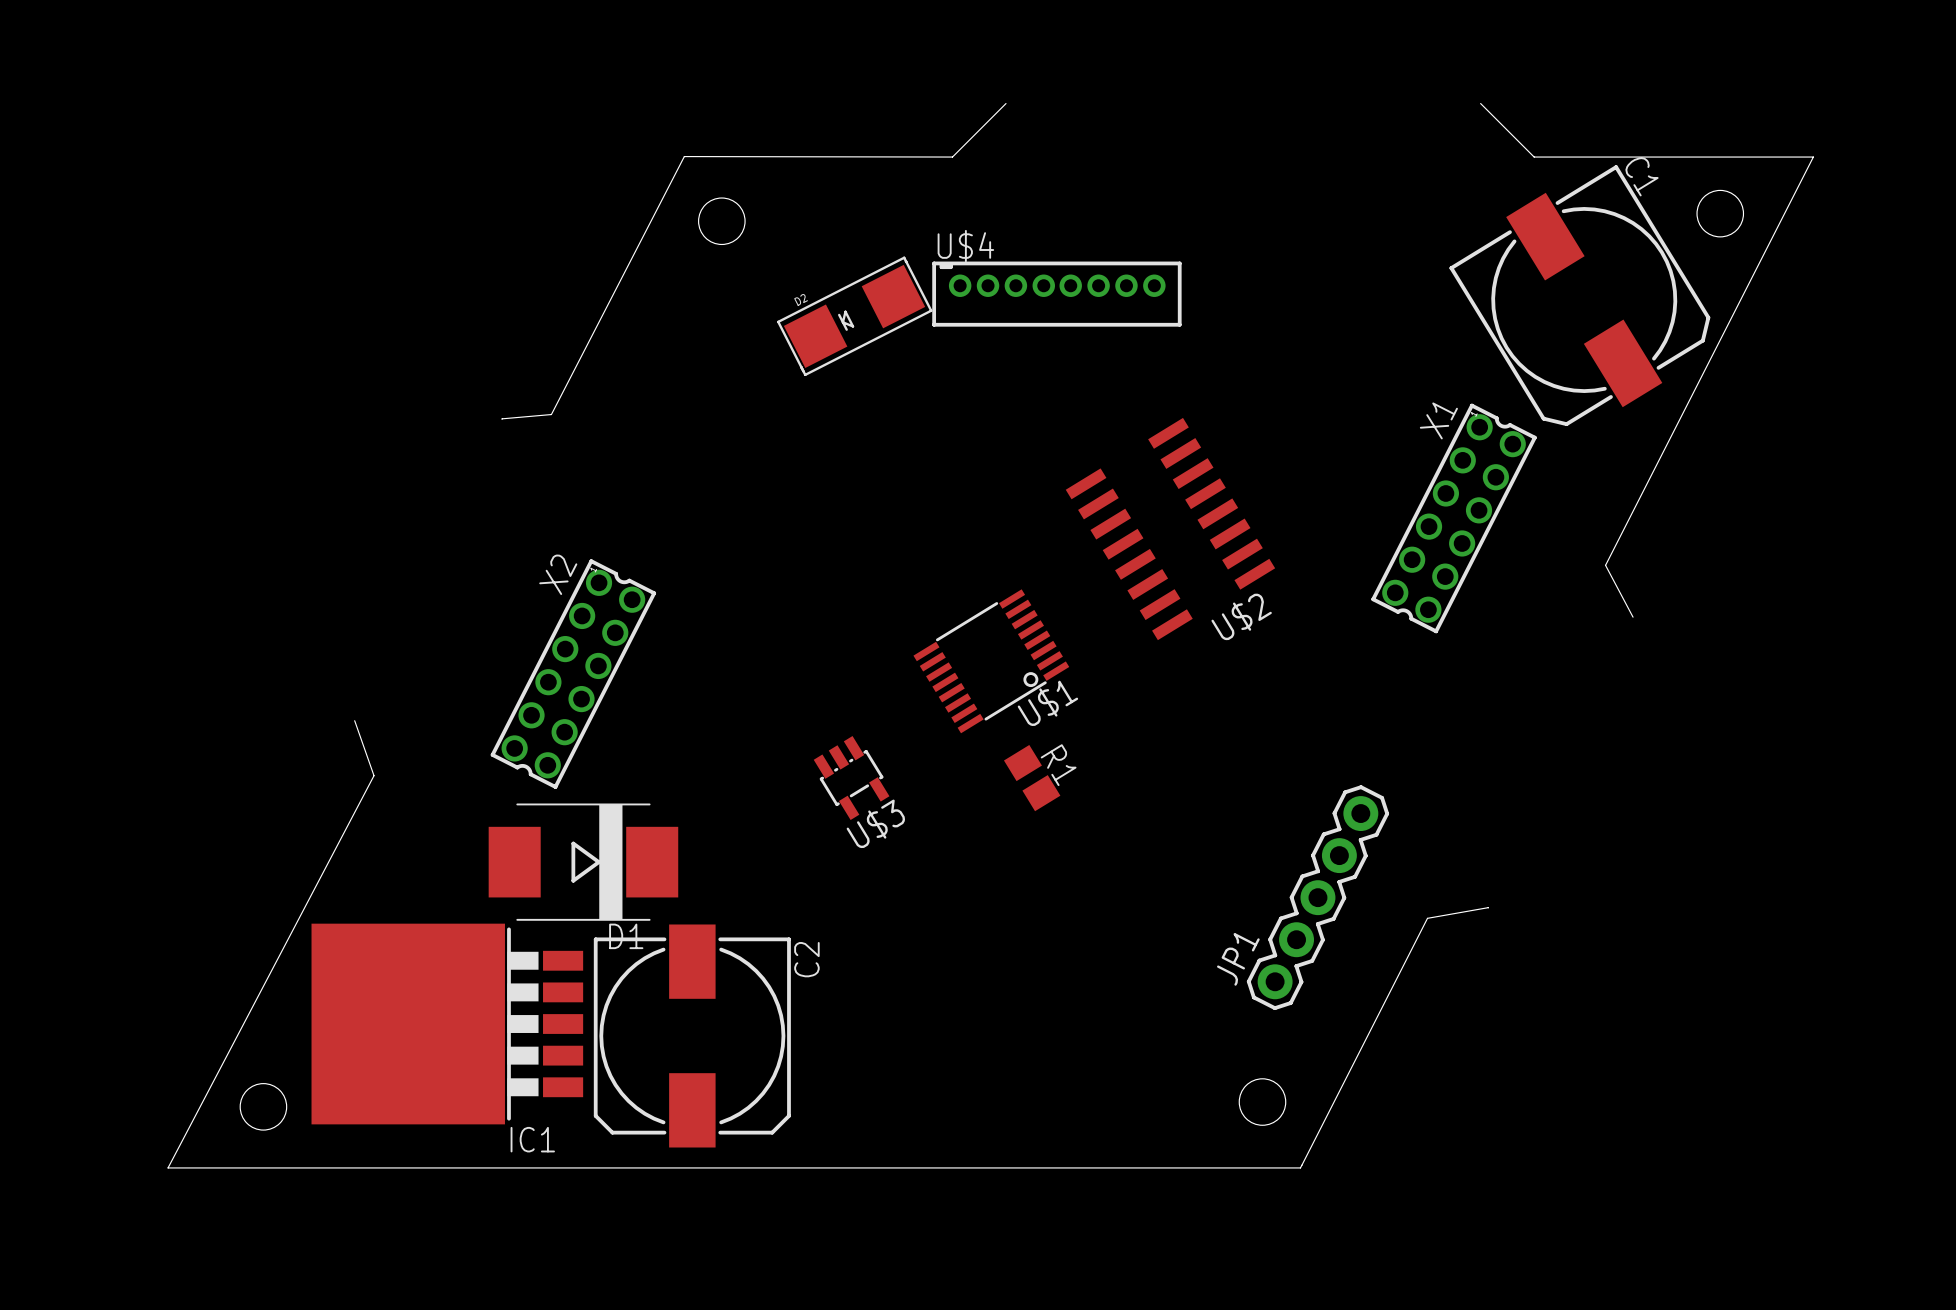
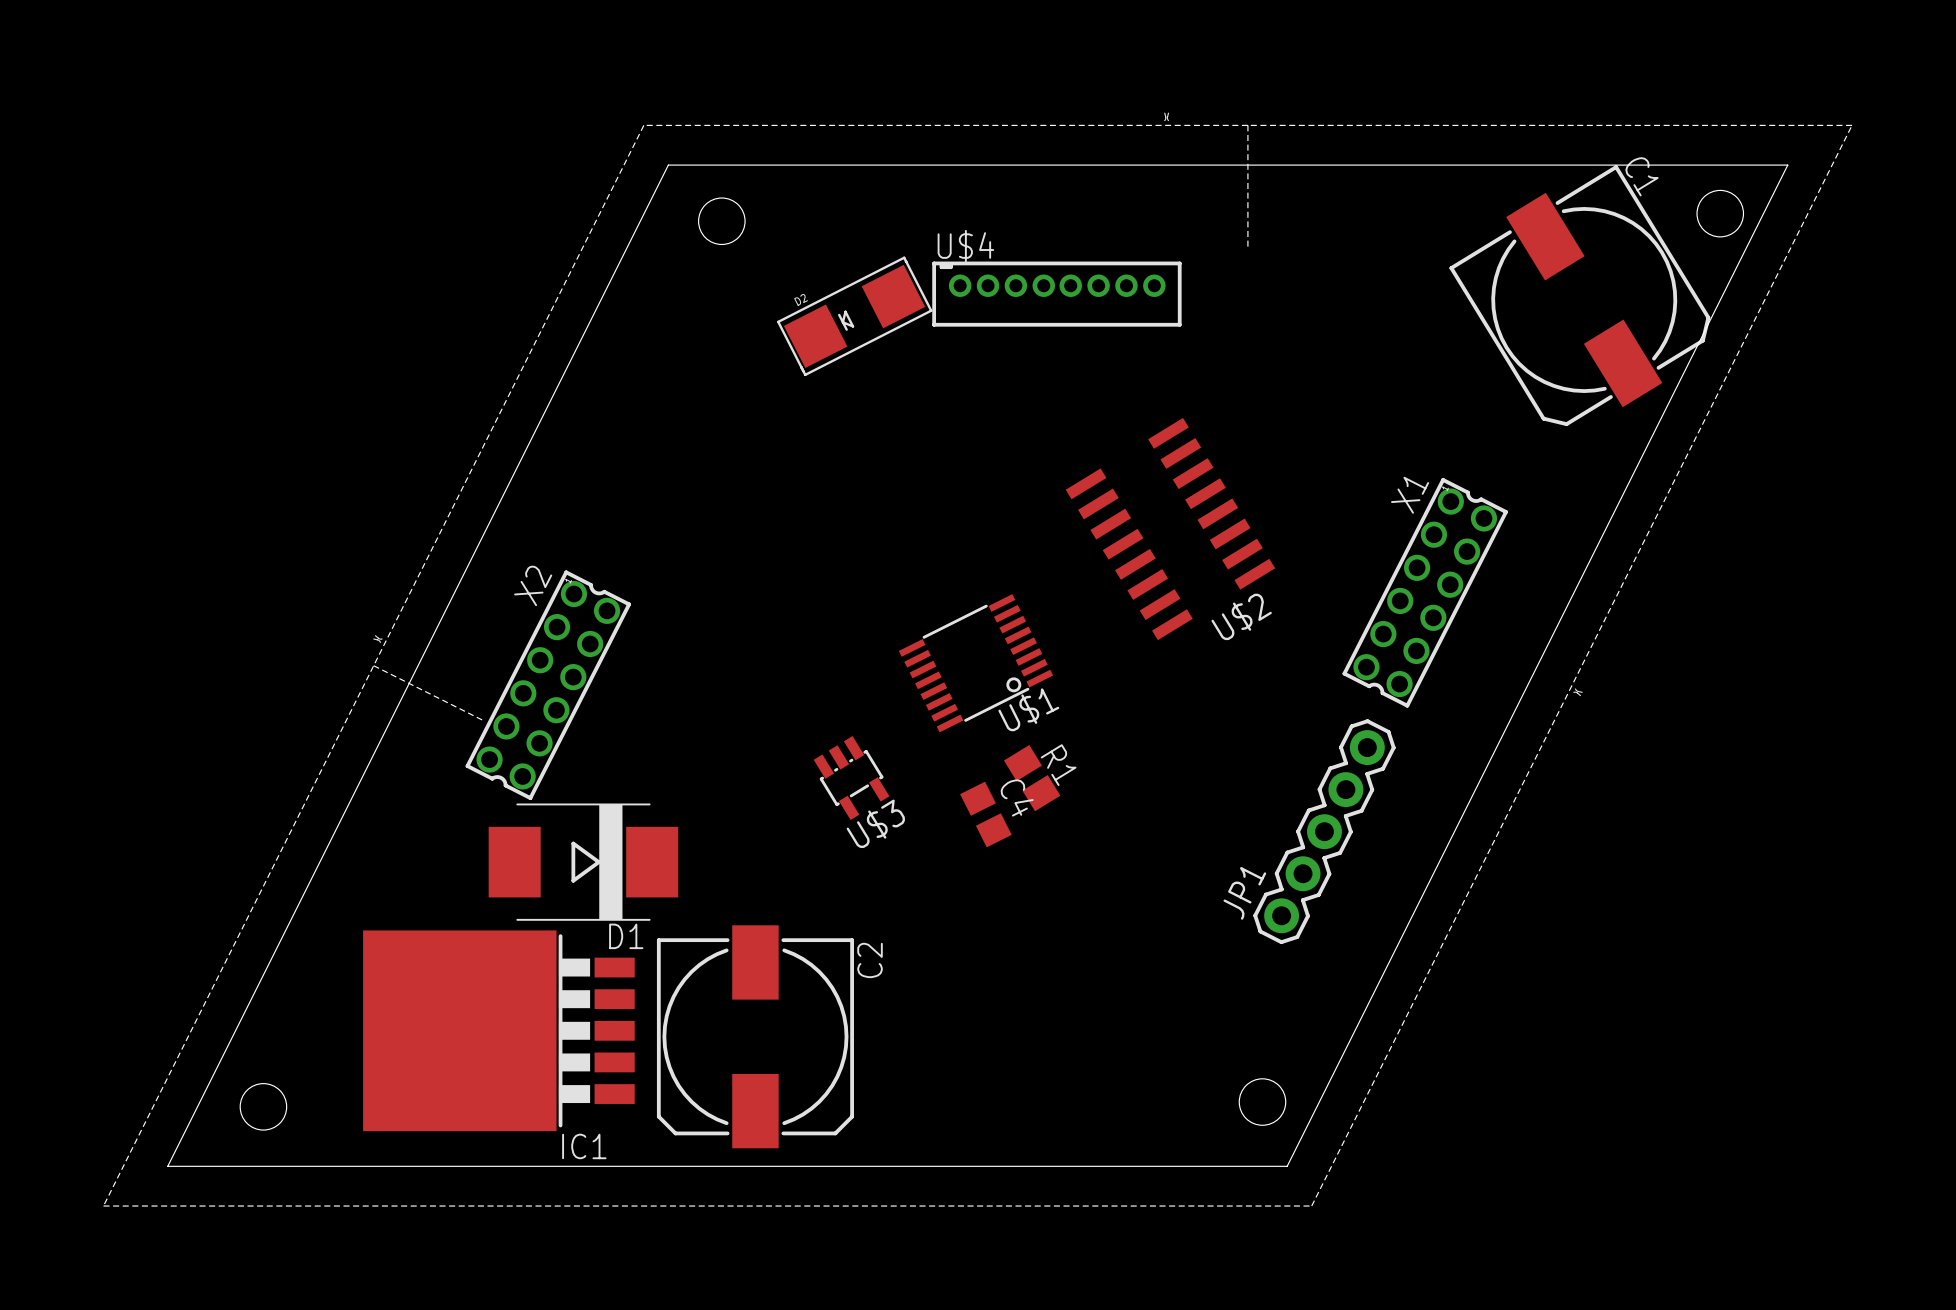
board edge: (1006, 103) (952, 157) (684, 156) (551, 414) (501, 419) -> none
board edge: (1480, 103) (1534, 157) (1813, 157) (1605, 565) (1633, 617) -> none
part: none -> (1166, 116)
board edge: none -> (643, 125) (1852, 125) (1311, 1206) (103, 1206) (643, 125)
board edge: none -> (1247, 125) (1247, 249)
board edge: none -> (668, 165) (167, 1166) (1287, 1166) (1787, 165) (668, 165)
X1 position: (1454, 518) -> (1425, 592)
part: none -> (377, 639)
U$1 rotation: 0° (991, 661) -> 4.9° clockwise (975, 663)
board edge: none -> (373, 665) (482, 720)
X2 position: (573, 674) -> (548, 685)
part: none -> (1577, 692)
board edge: (354, 720) (373, 775) (168, 1167) (1300, 1167) (1427, 918) (1488, 907) -> none
C4: none -> (985, 814)
JP1 position: (1317, 897) -> (1324, 831)
IC1 position: (447, 1024) -> (498, 1030)
C2 position: (692, 1035) -> (755, 1036)

